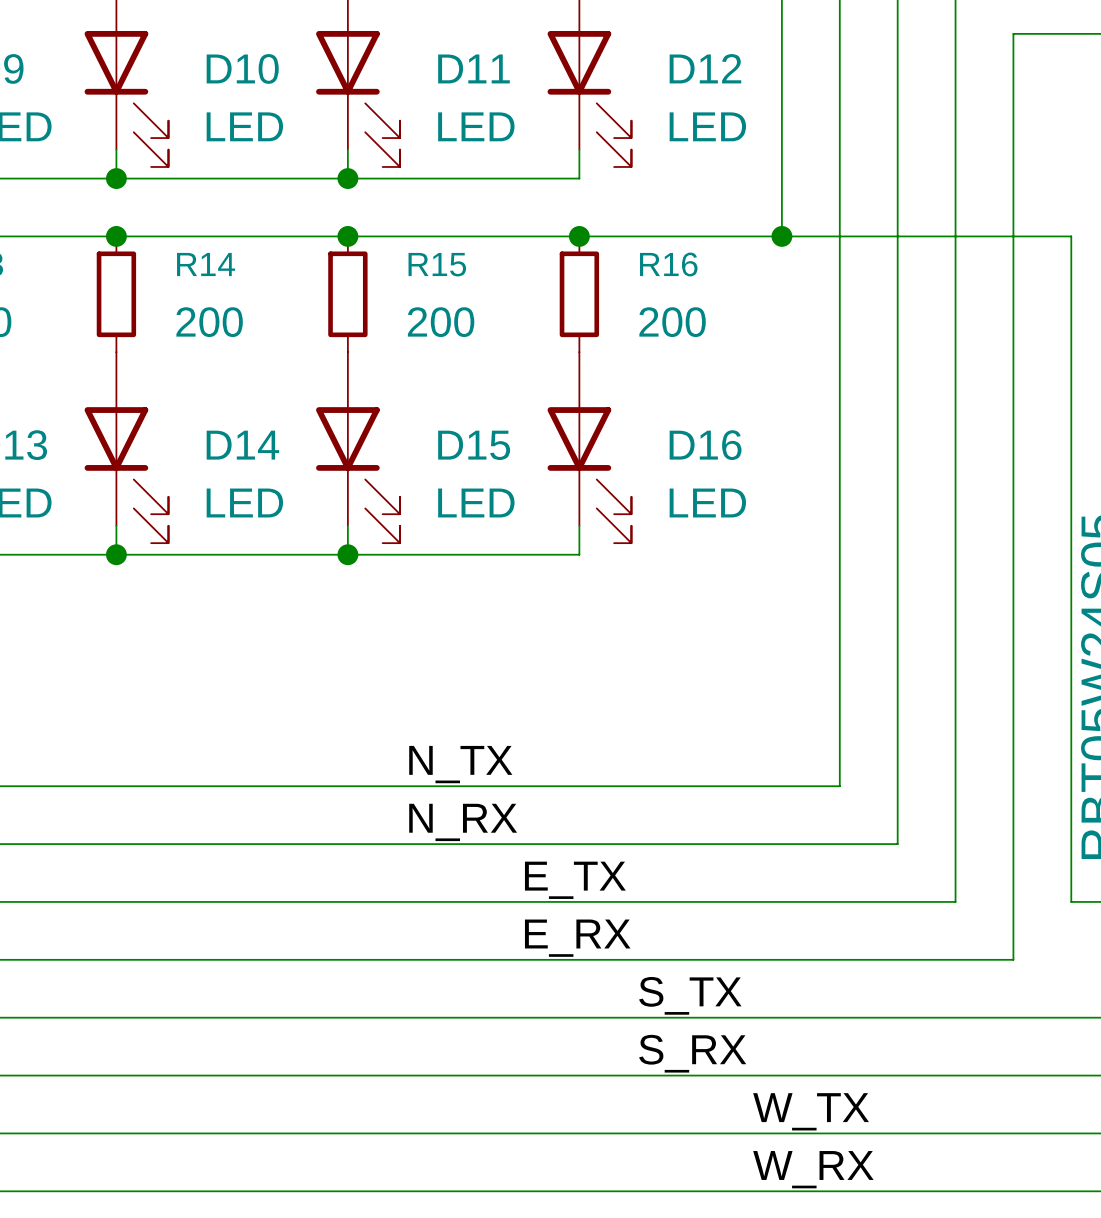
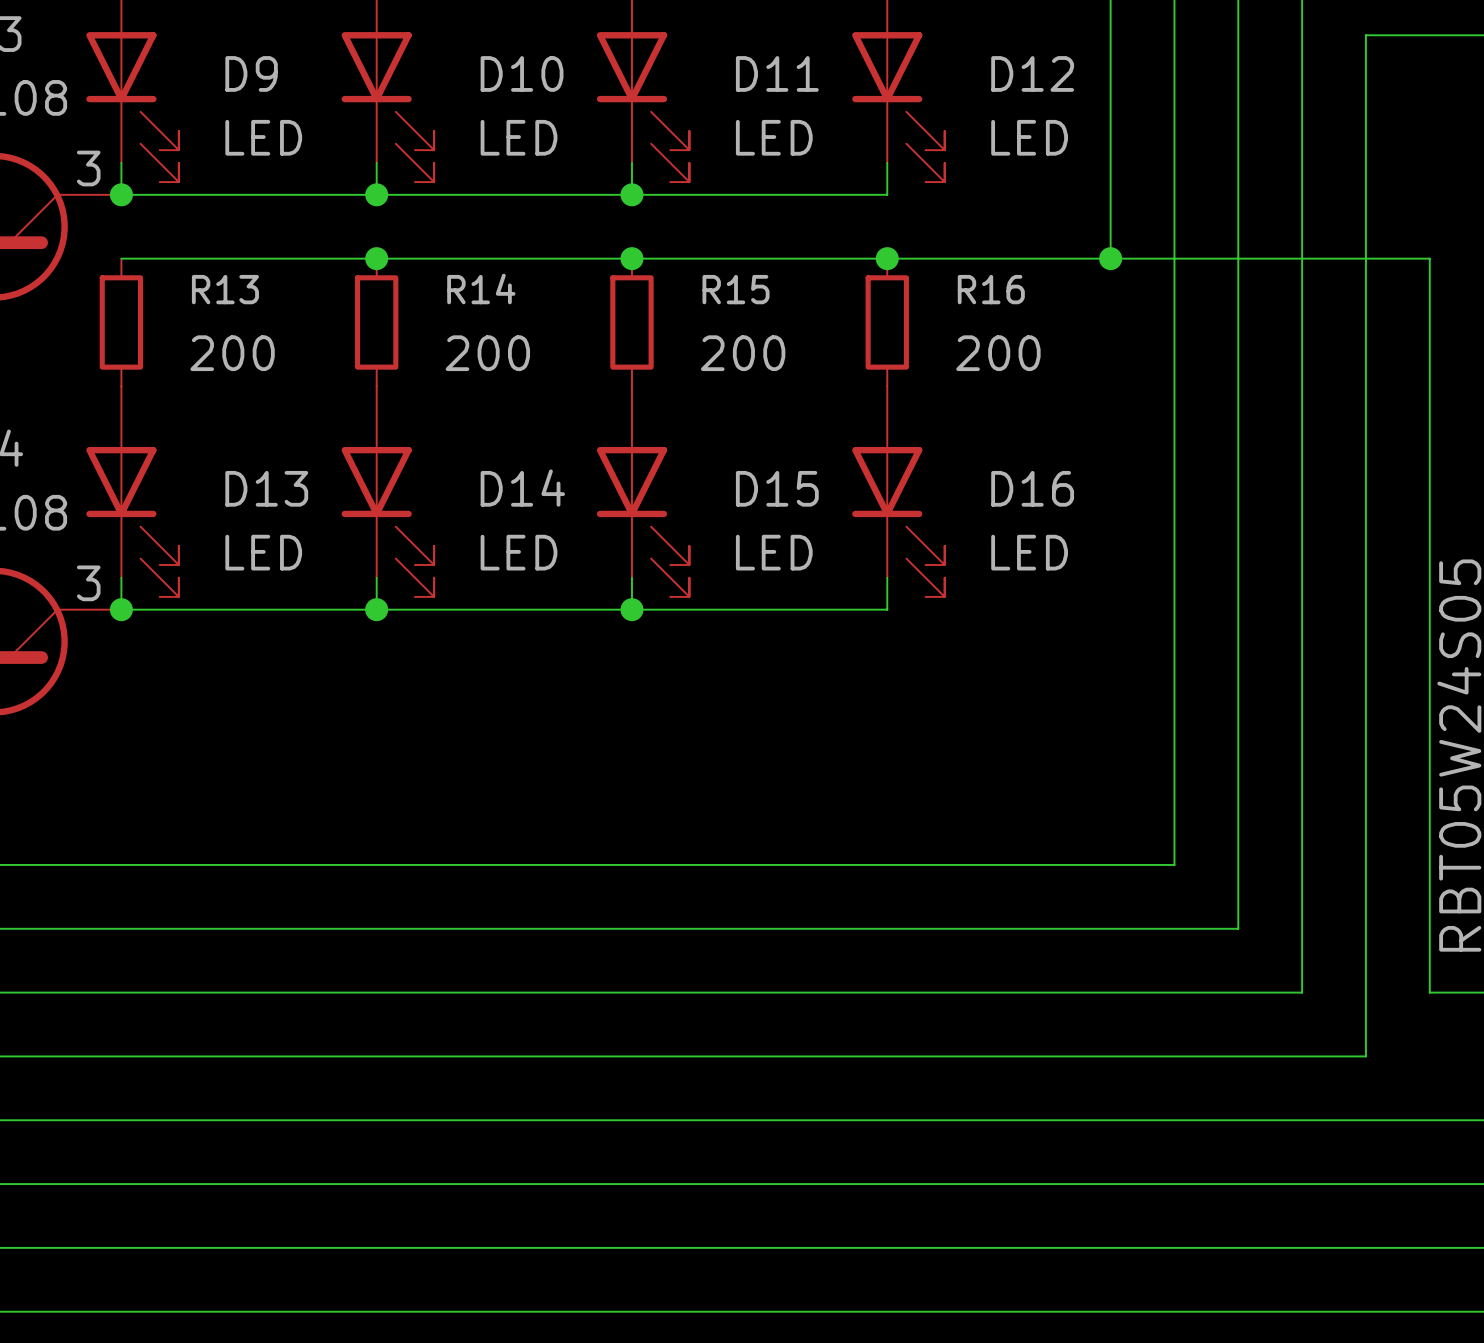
label: N_TX (460, 764) -> none
label: N_RX (463, 822) -> none
label: E_TX (575, 880) -> none
label: E_RX (577, 938) -> none
label: S_TX (690, 995) -> none
label: S_RX (692, 1053) -> none
label: W_TX (811, 1111) -> none
label: W_RX (813, 1169) -> none

